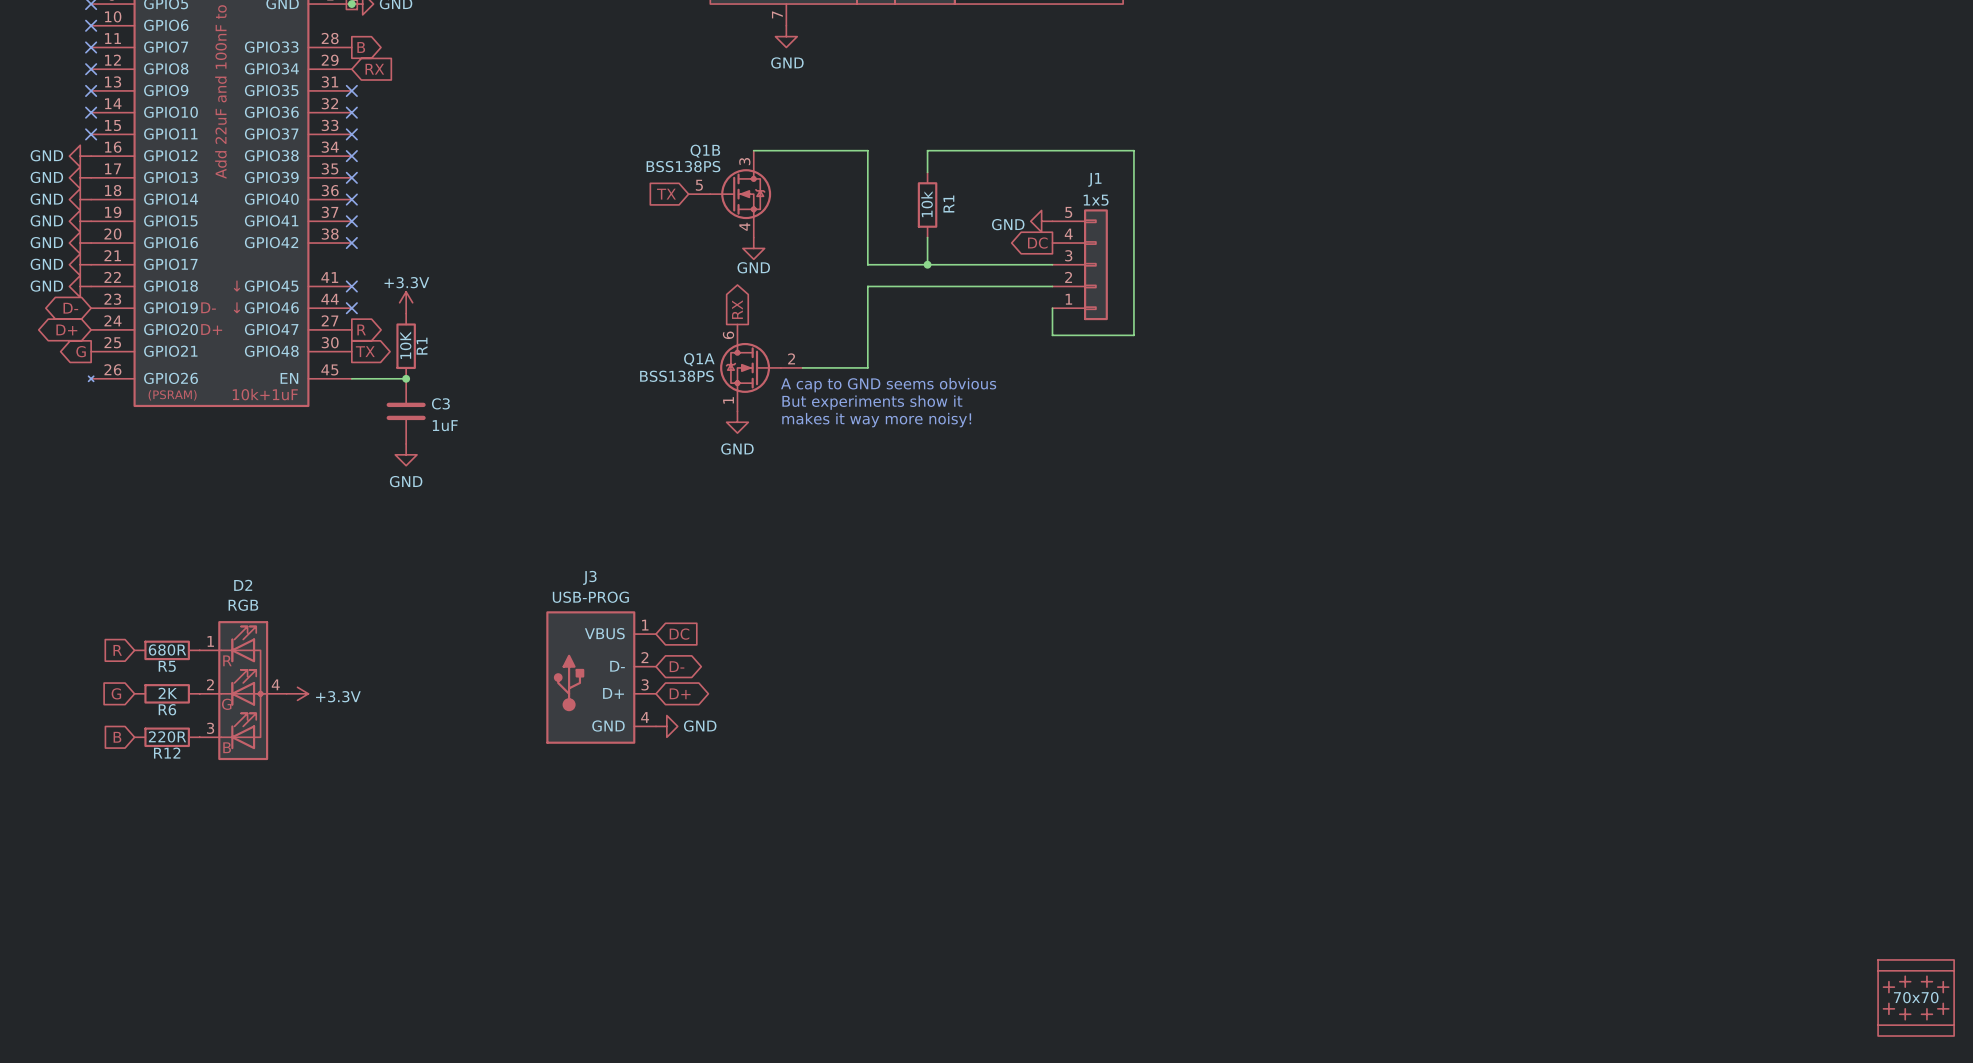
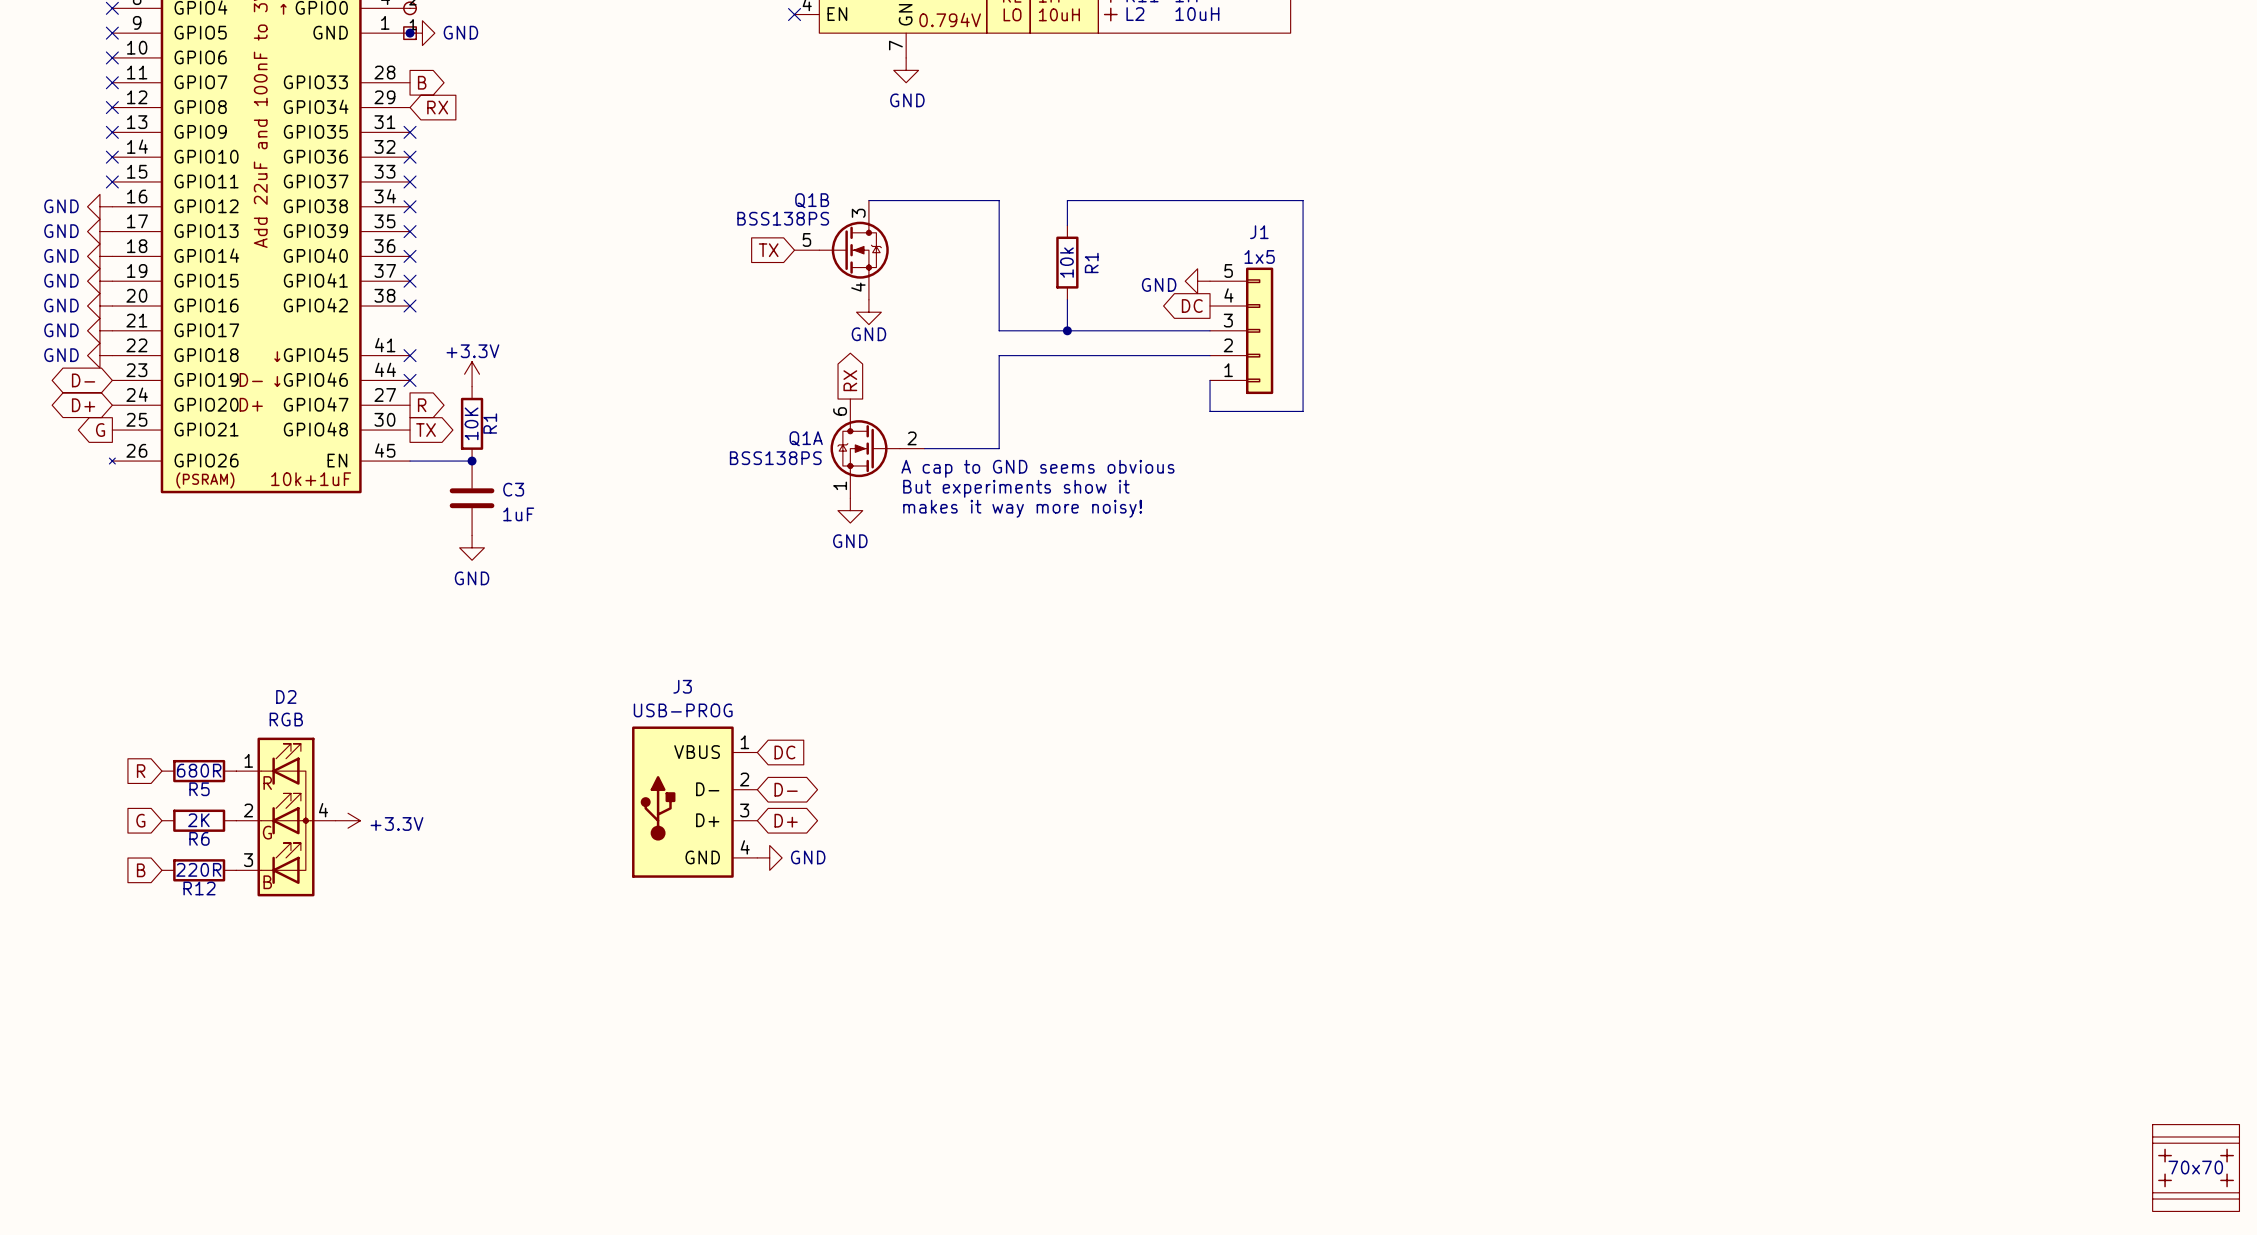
part: none -> (2196, 1143)
part: (1905, 981) -> none
part: (1926, 981) -> none
part: (1905, 1014) -> none
part: (1926, 1014) -> none
part: none -> (2196, 1192)

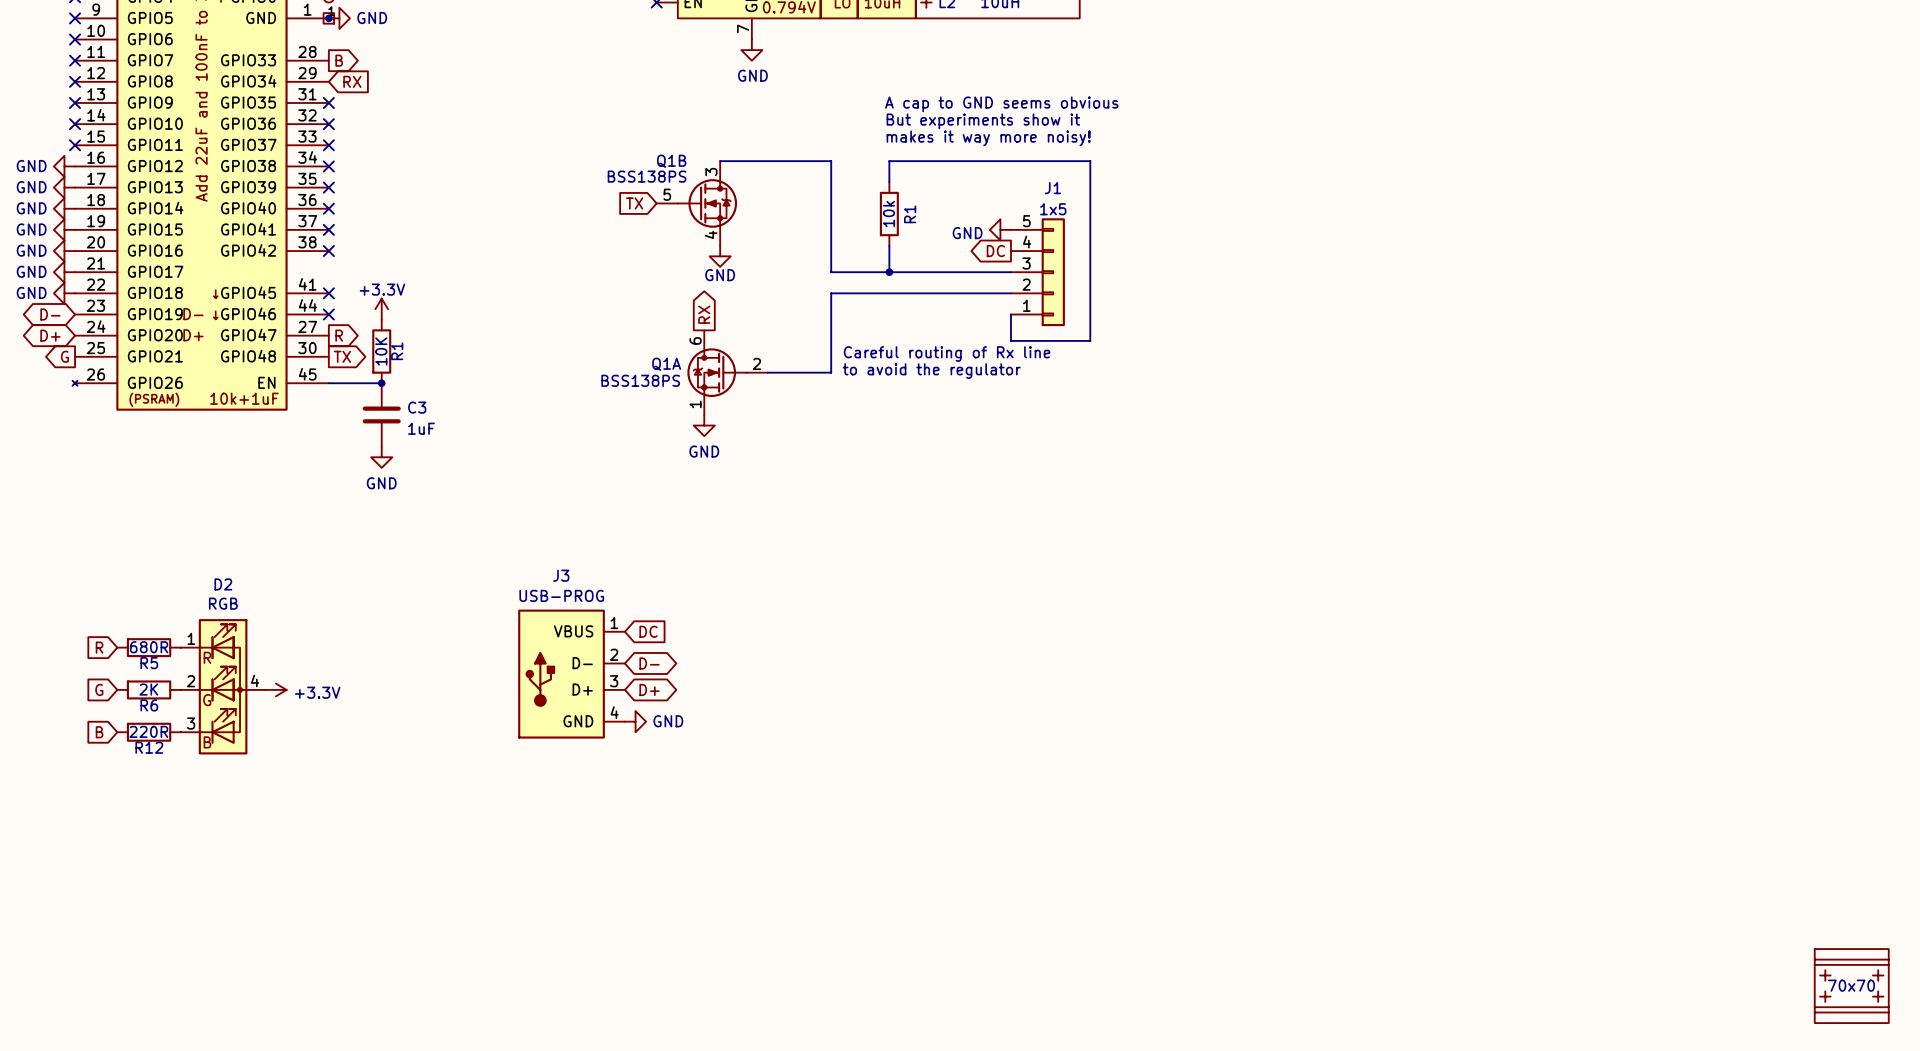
text: none -> A cap to GND seems obvious (1001, 104)
text: none -> But experiments show it (983, 121)
text: none -> makes it way more noisy! (988, 138)
text: none -> Careful routing of Rx line (947, 354)
text: none -> to avoid the regulator (931, 371)
text: A cap to GND seems obvious (1037, 468) -> none
text: But experiments show it (1016, 488) -> none
text: makes it way more noisy! (1022, 508) -> none

